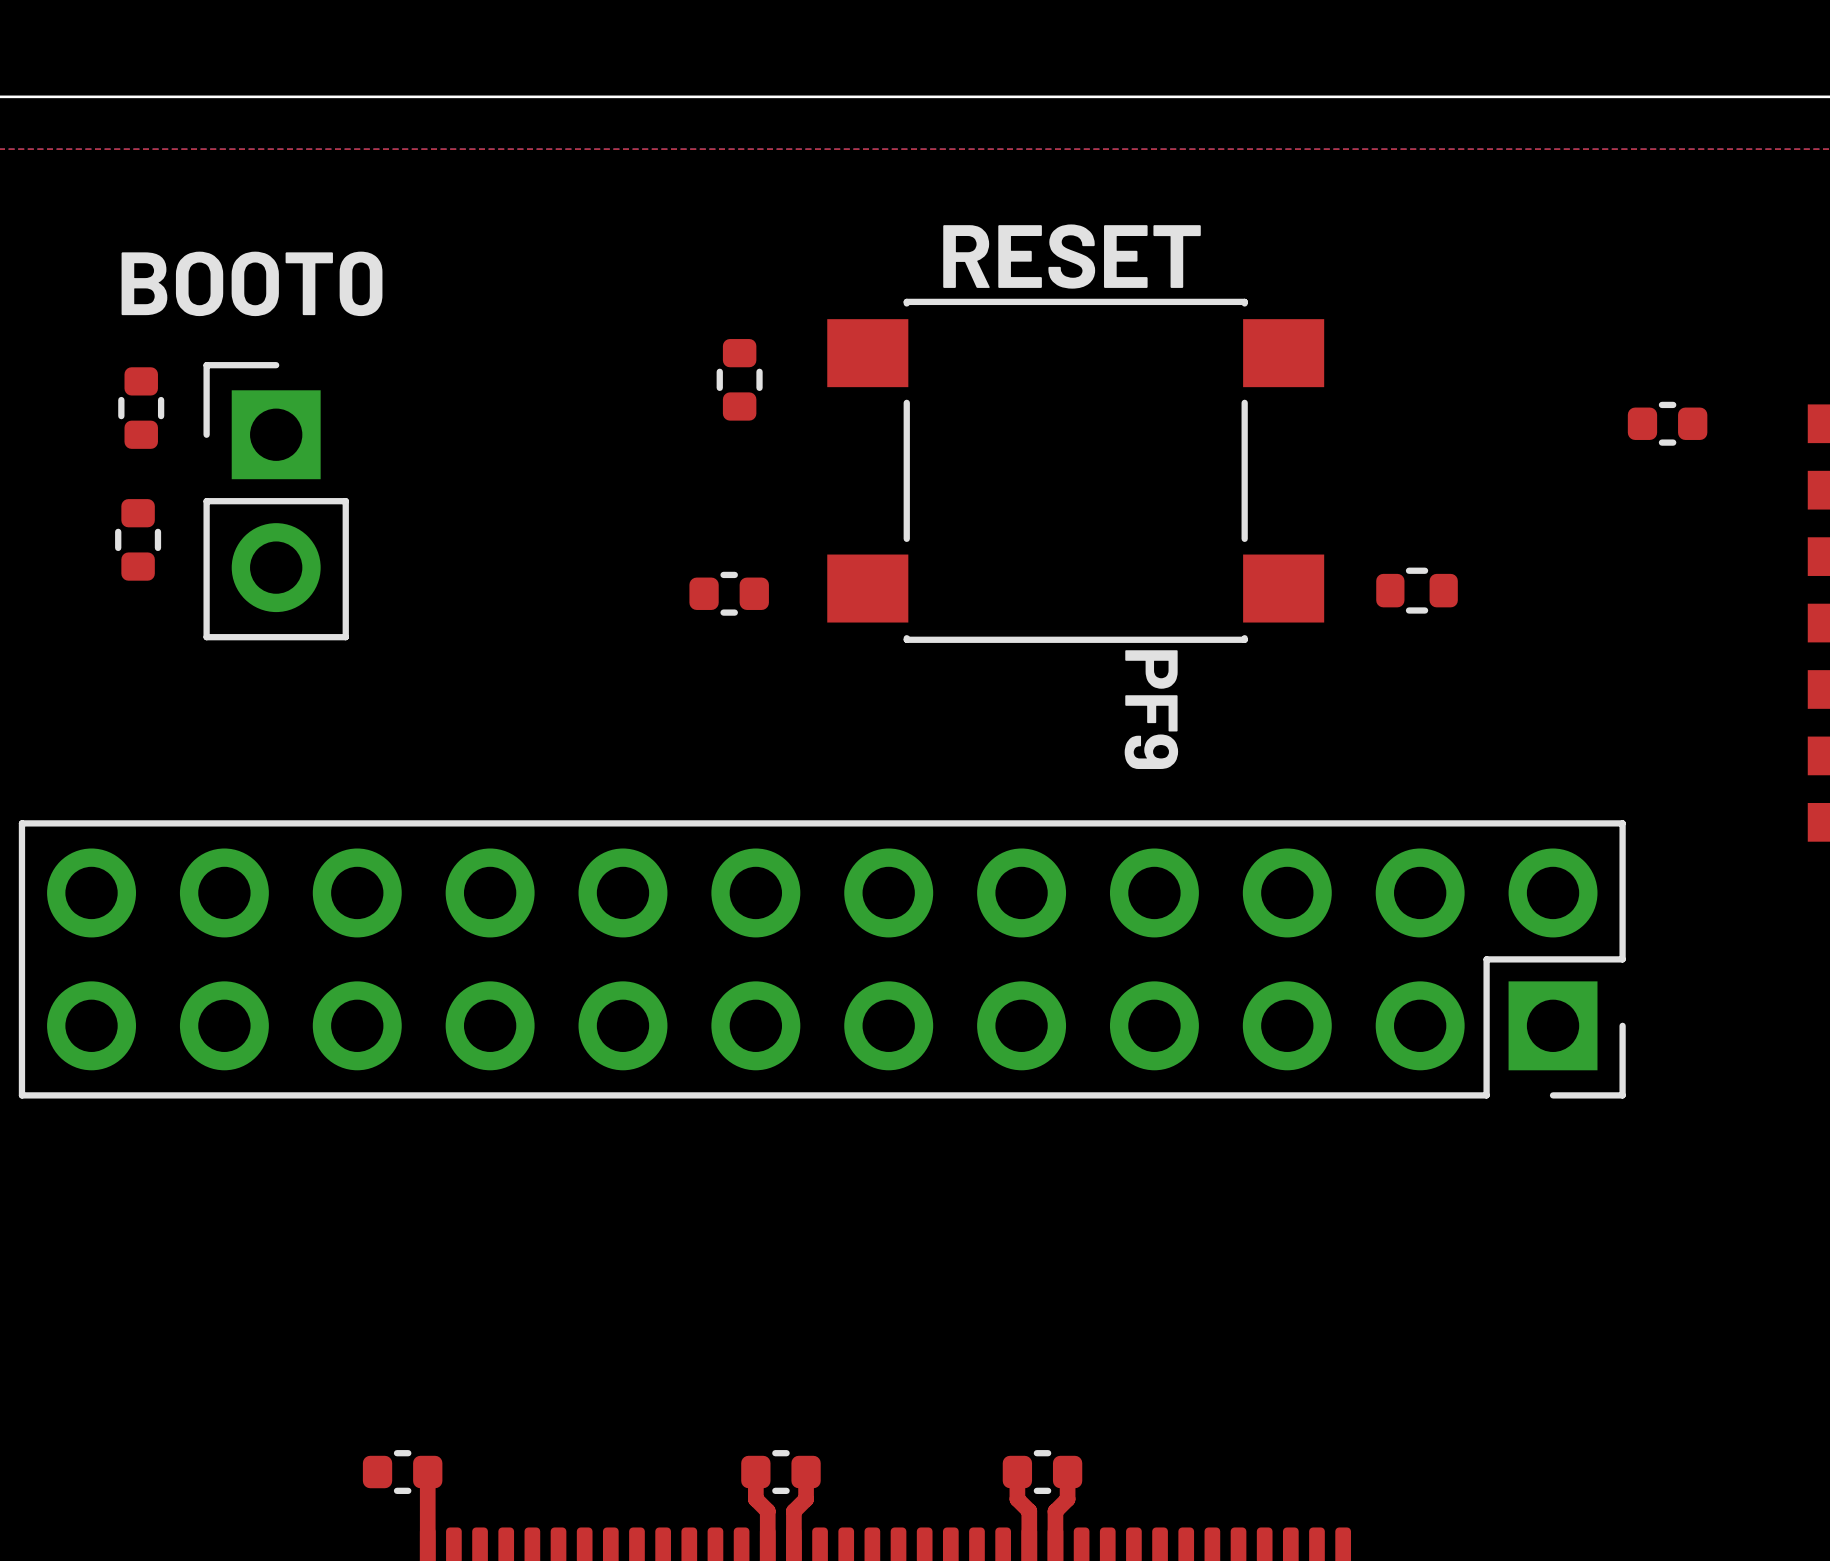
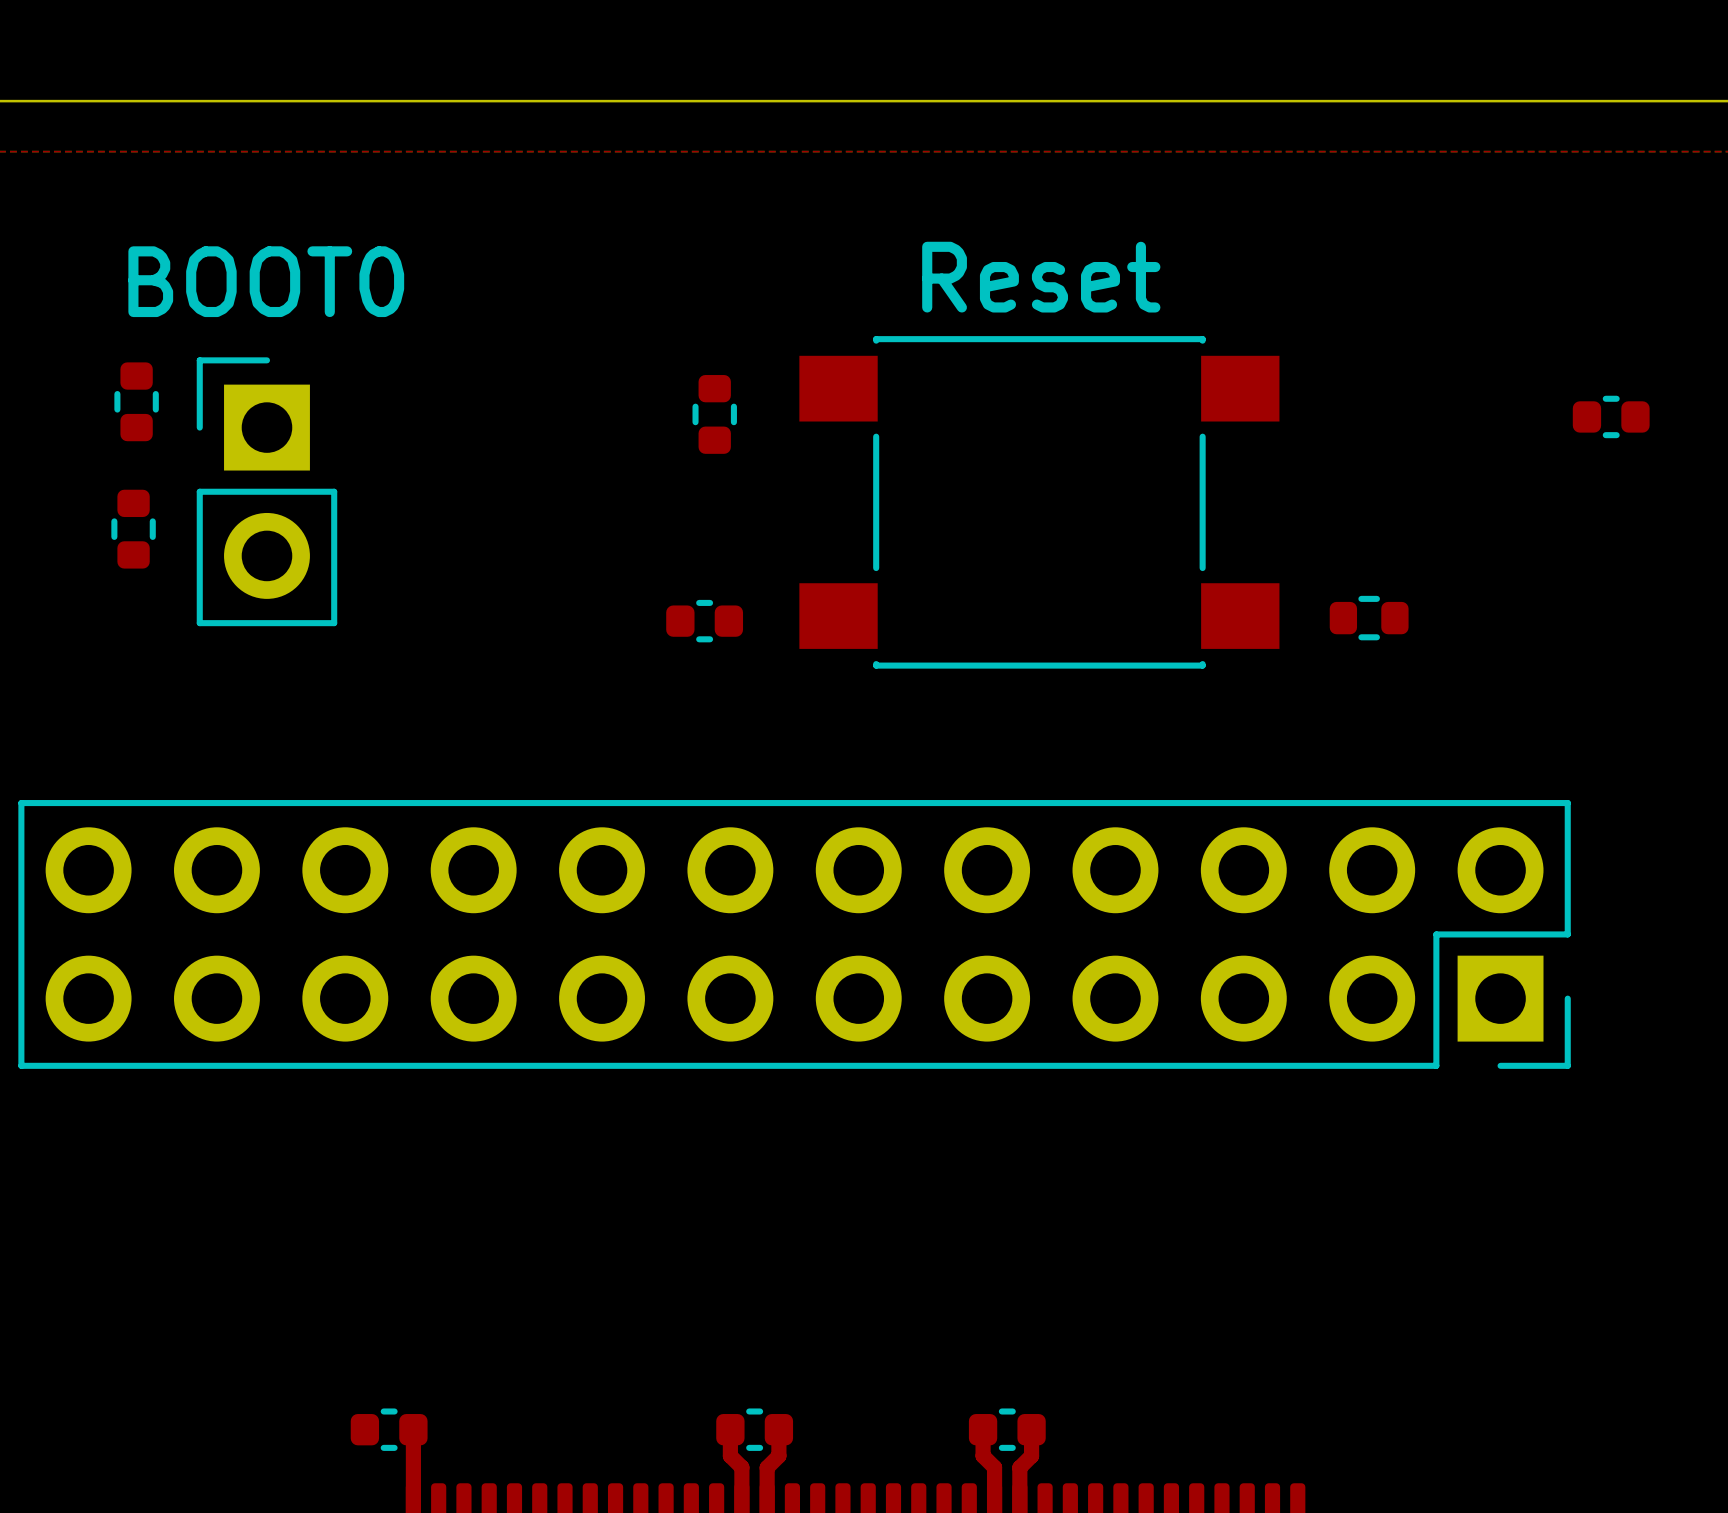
text: RESET (1072, 256) -> Reset (1041, 277)
part position: (739, 379) -> (714, 414)
part position: (1075, 470) -> (1039, 502)
part position: (1417, 590) -> (1369, 618)
part position: (729, 593) -> (704, 621)
text: PF9 (1151, 709) -> none

